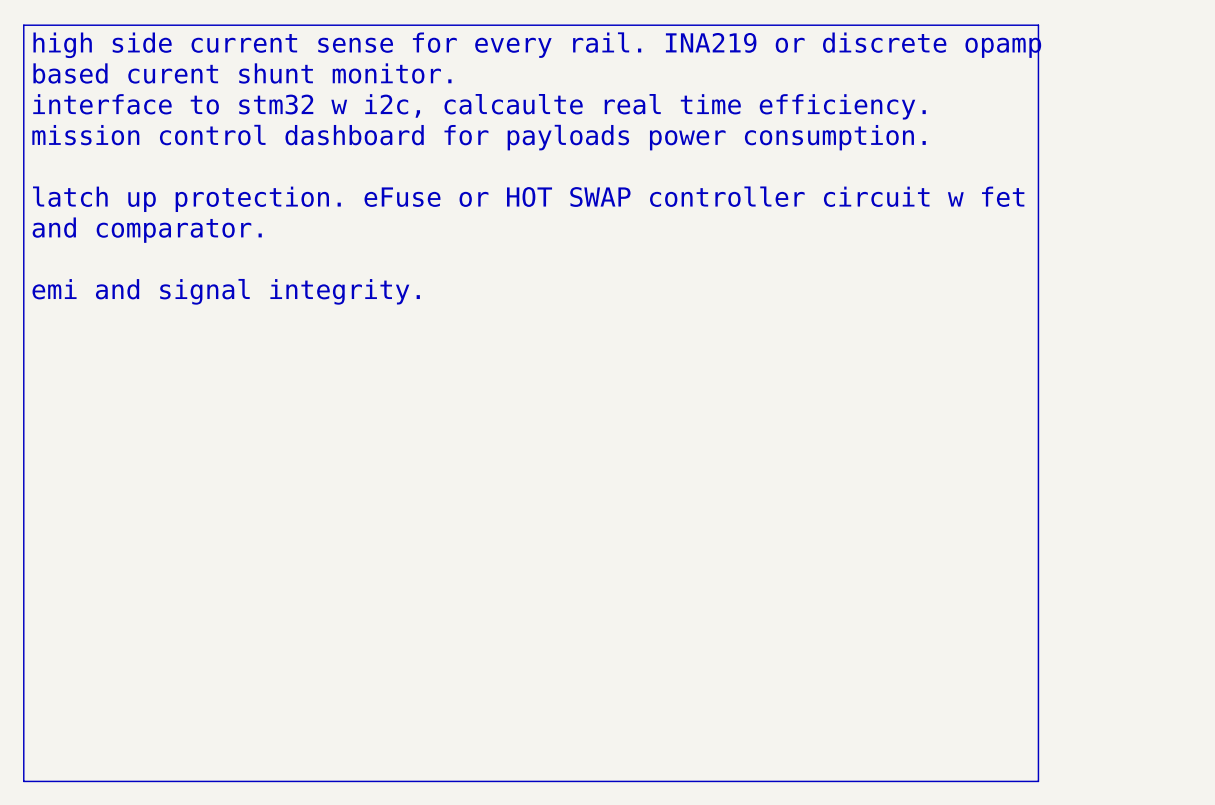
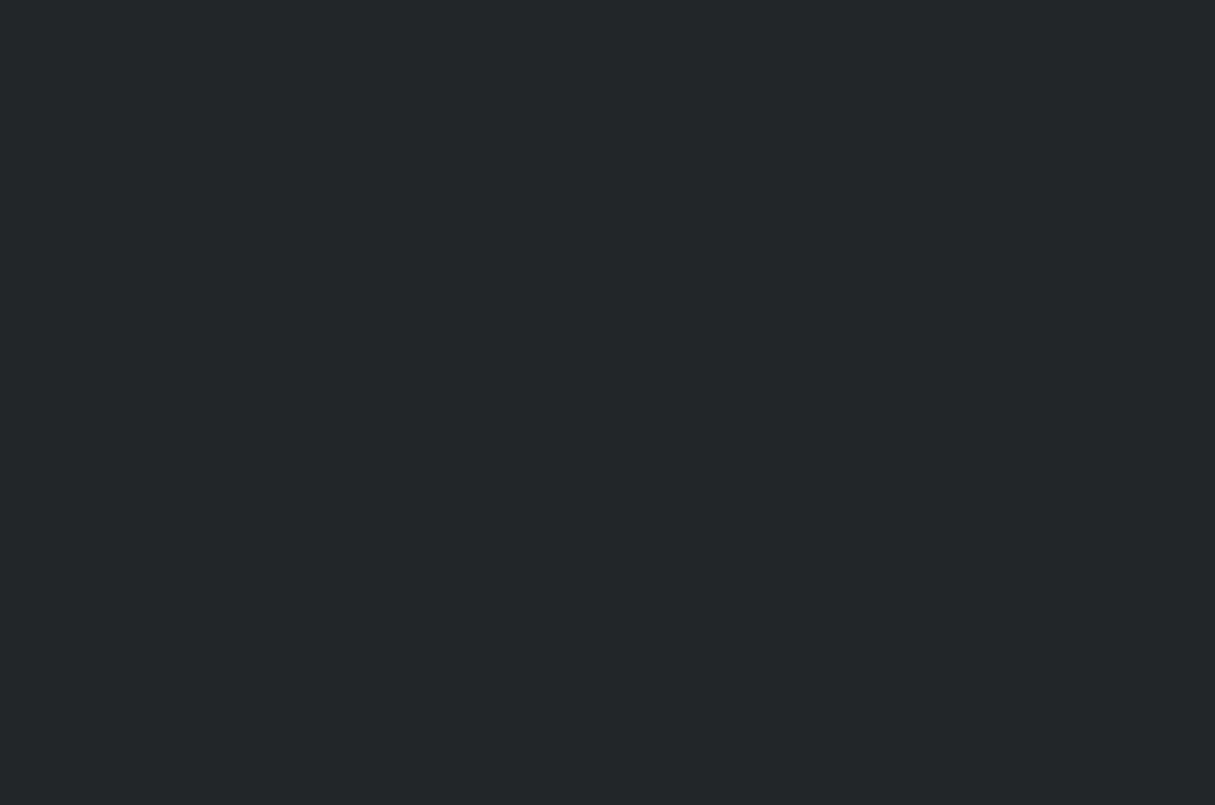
line: (23, 25) (1038, 25) (1038, 781) (23, 781) (23, 25) -> none
text: high side current sense for every rail. INA219 or discrete opamp (537, 45) -> none
text: based curent shunt monitor. (242, 73) -> none
text: interface to stm32 w i2c, calcaulte real time efficiency. (479, 106) -> none
text: mission control dashboard for payloads power consumption. (479, 137) -> none
text: latch up protection. eFuse or HOT SWAP controller circuit w fet (528, 199) -> none
text: and comparator. (147, 230) -> none
text: emi and signal integrity. (226, 291) -> none

